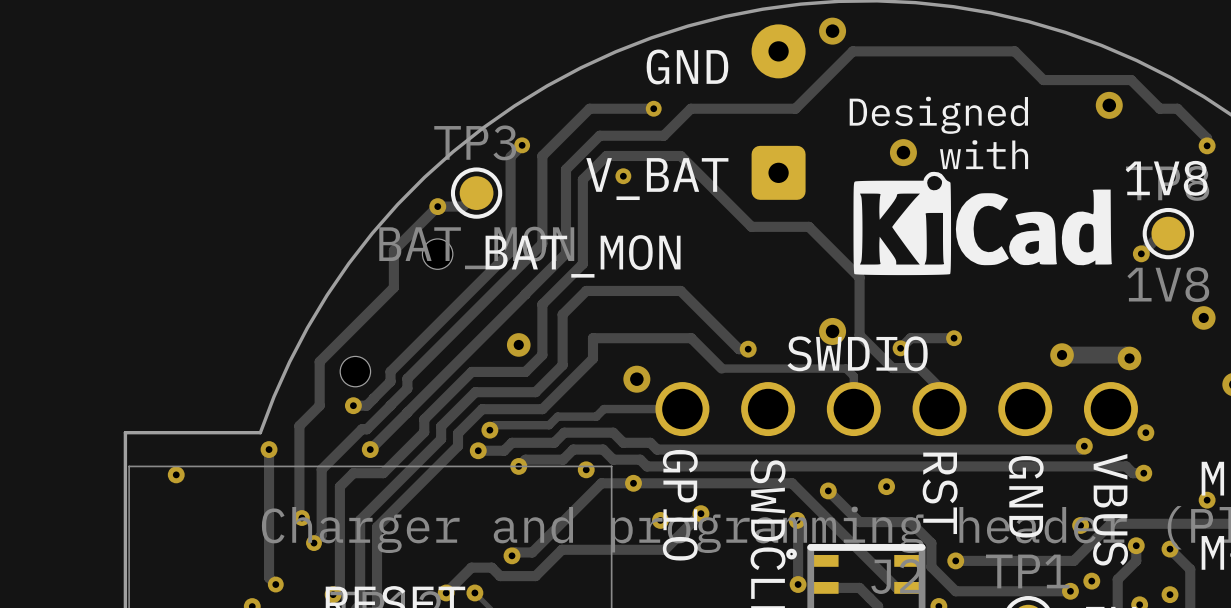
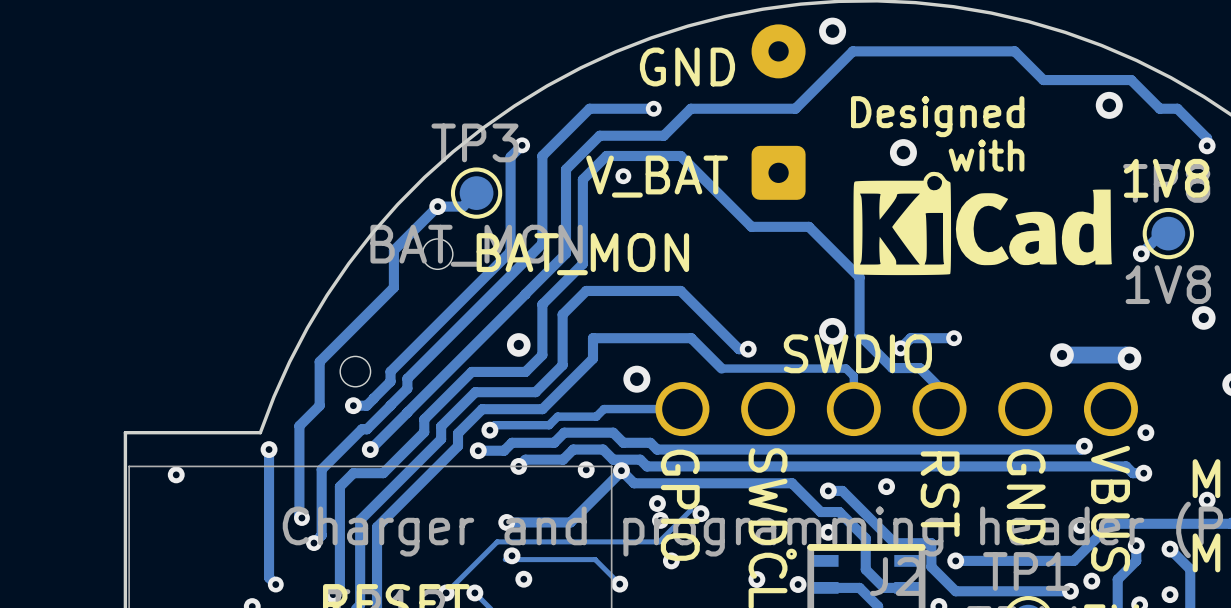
via position: (633, 483) -> (621, 470)
track: (634, 483) (601, 483) (532, 552) (515, 552) (512, 555) -> (634, 483) (621, 470) (570, 522) (506, 522)
track: (828, 490) (859, 522) (910, 522) (931, 543) -> (828, 490) (842, 490) (894, 543) (931, 543)
via: none -> (657, 503)
track: (820, 512) (896, 587) -> (820, 512) (839, 512) (865, 538) (865, 569) (884, 587) (896, 587)
track: (700, 513) (664, 549) (561, 549) (535, 576) (500, 576) (491, 567) (471, 567) -> (690, 510) (659, 541) (497, 541) (471, 567)
track: (797, 520) (798, 584) -> none
via position: (797, 520) -> (828, 532)
via: none -> (506, 522)
track: none -> (505, 559) (595, 559) (619, 584)
via: none -> (671, 560)
track width: thick (471, 567) (446, 592) -> thin (471, 567) (446, 592)
via: none -> (523, 579)
via: none -> (756, 579)
via: none -> (619, 584)

